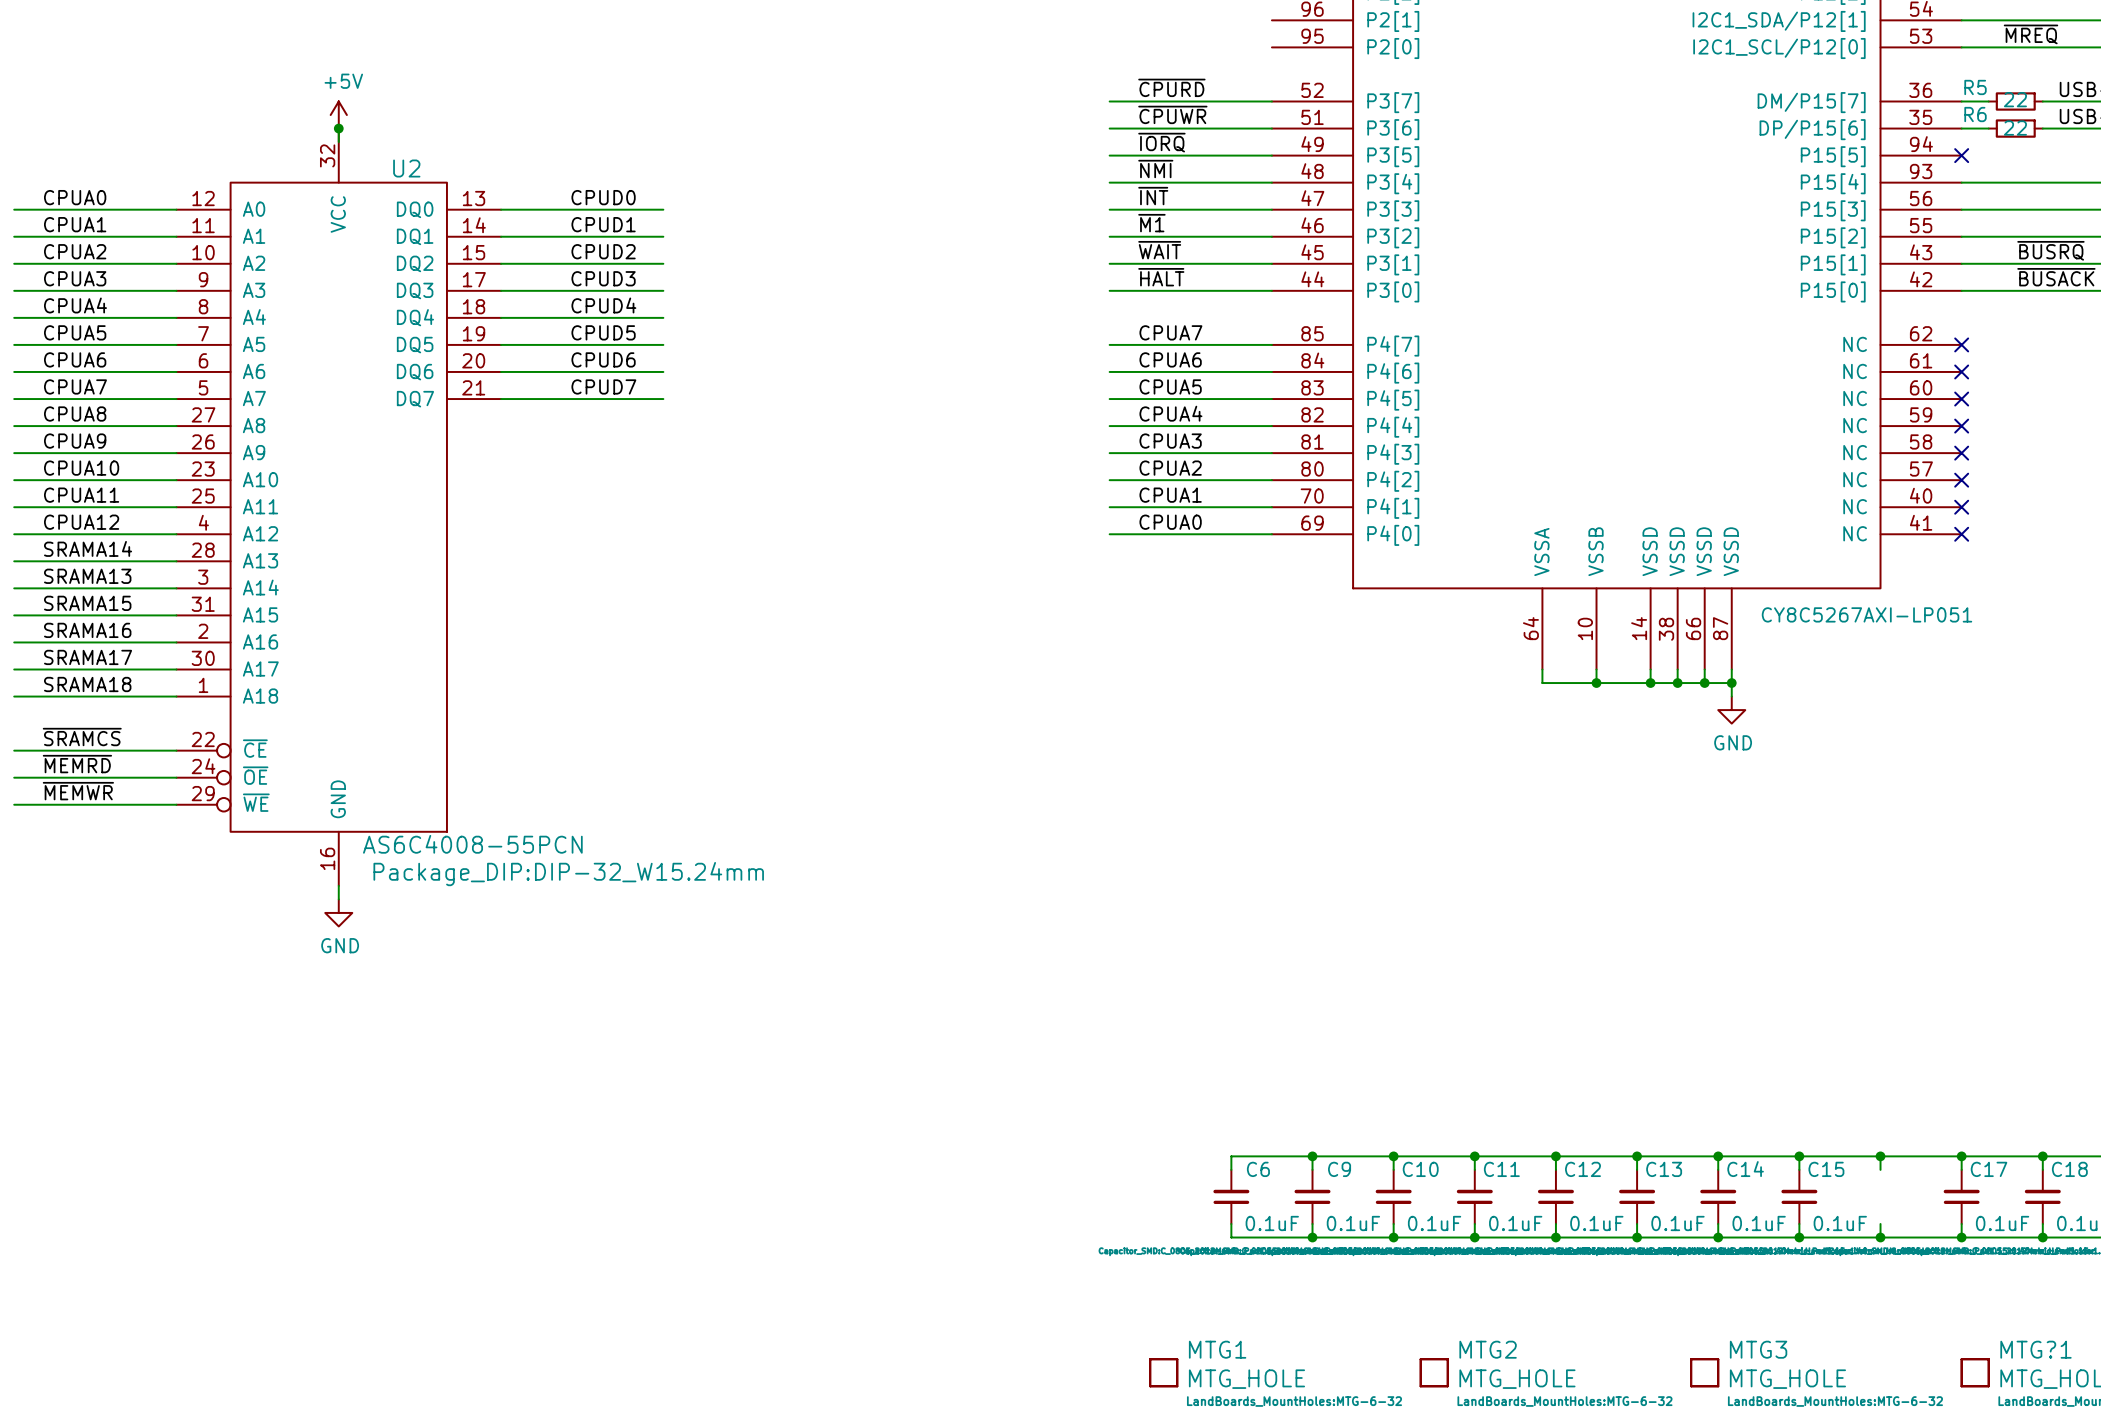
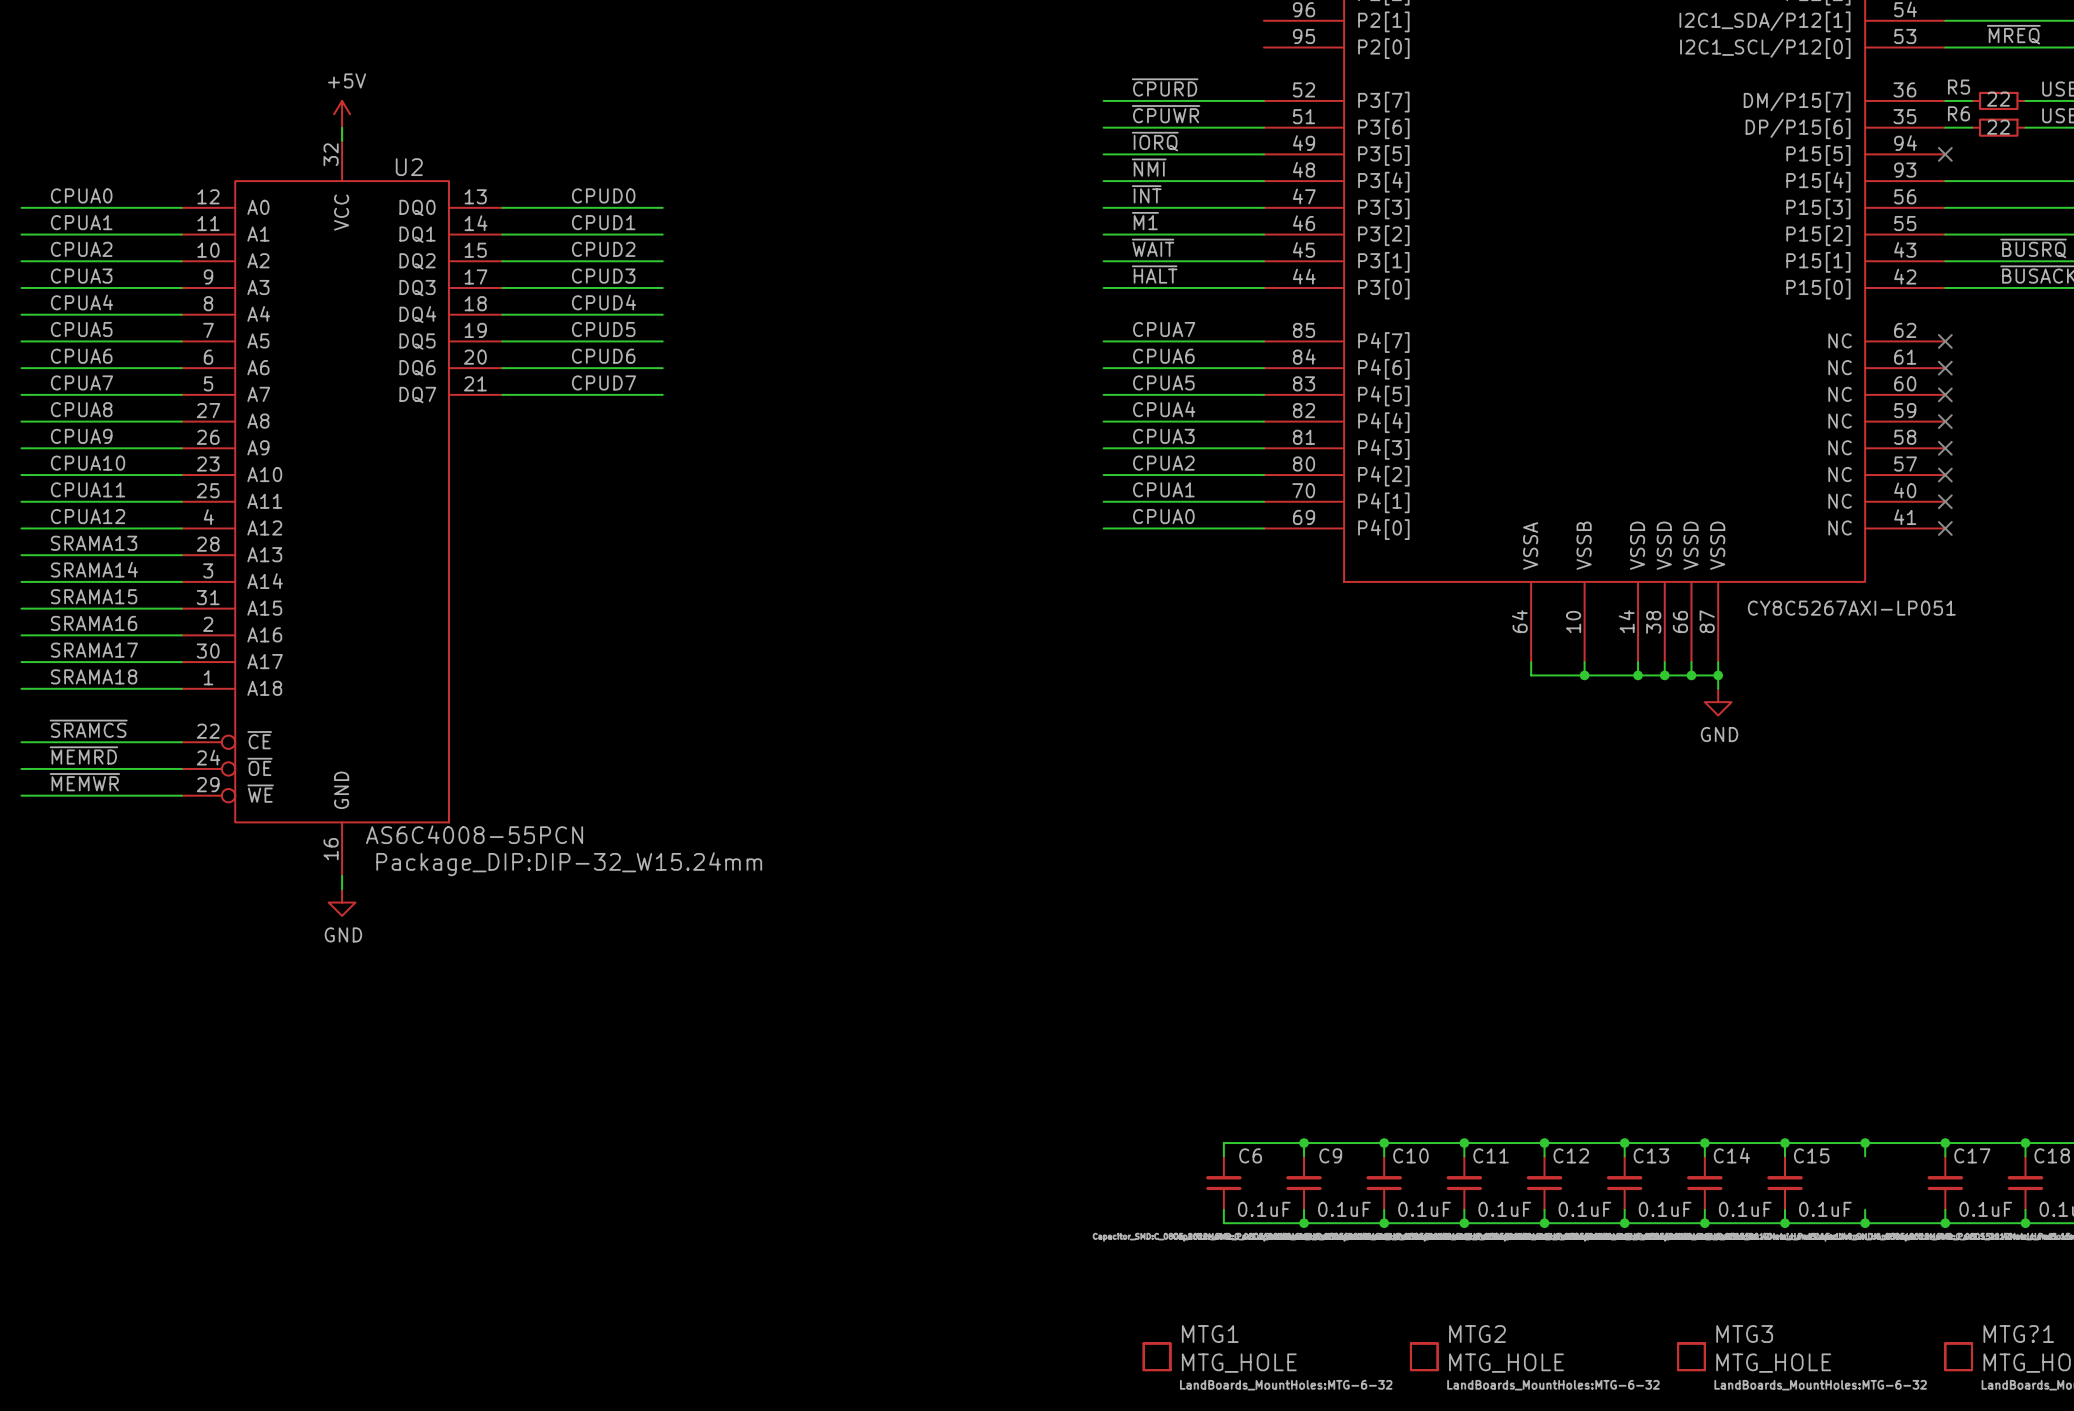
junction: (338, 128) -> none
label: SRAMA14 (88, 548) -> SRAMA13 (94, 543)
label: SRAMA13 (87, 576) -> SRAMA14 (94, 569)

